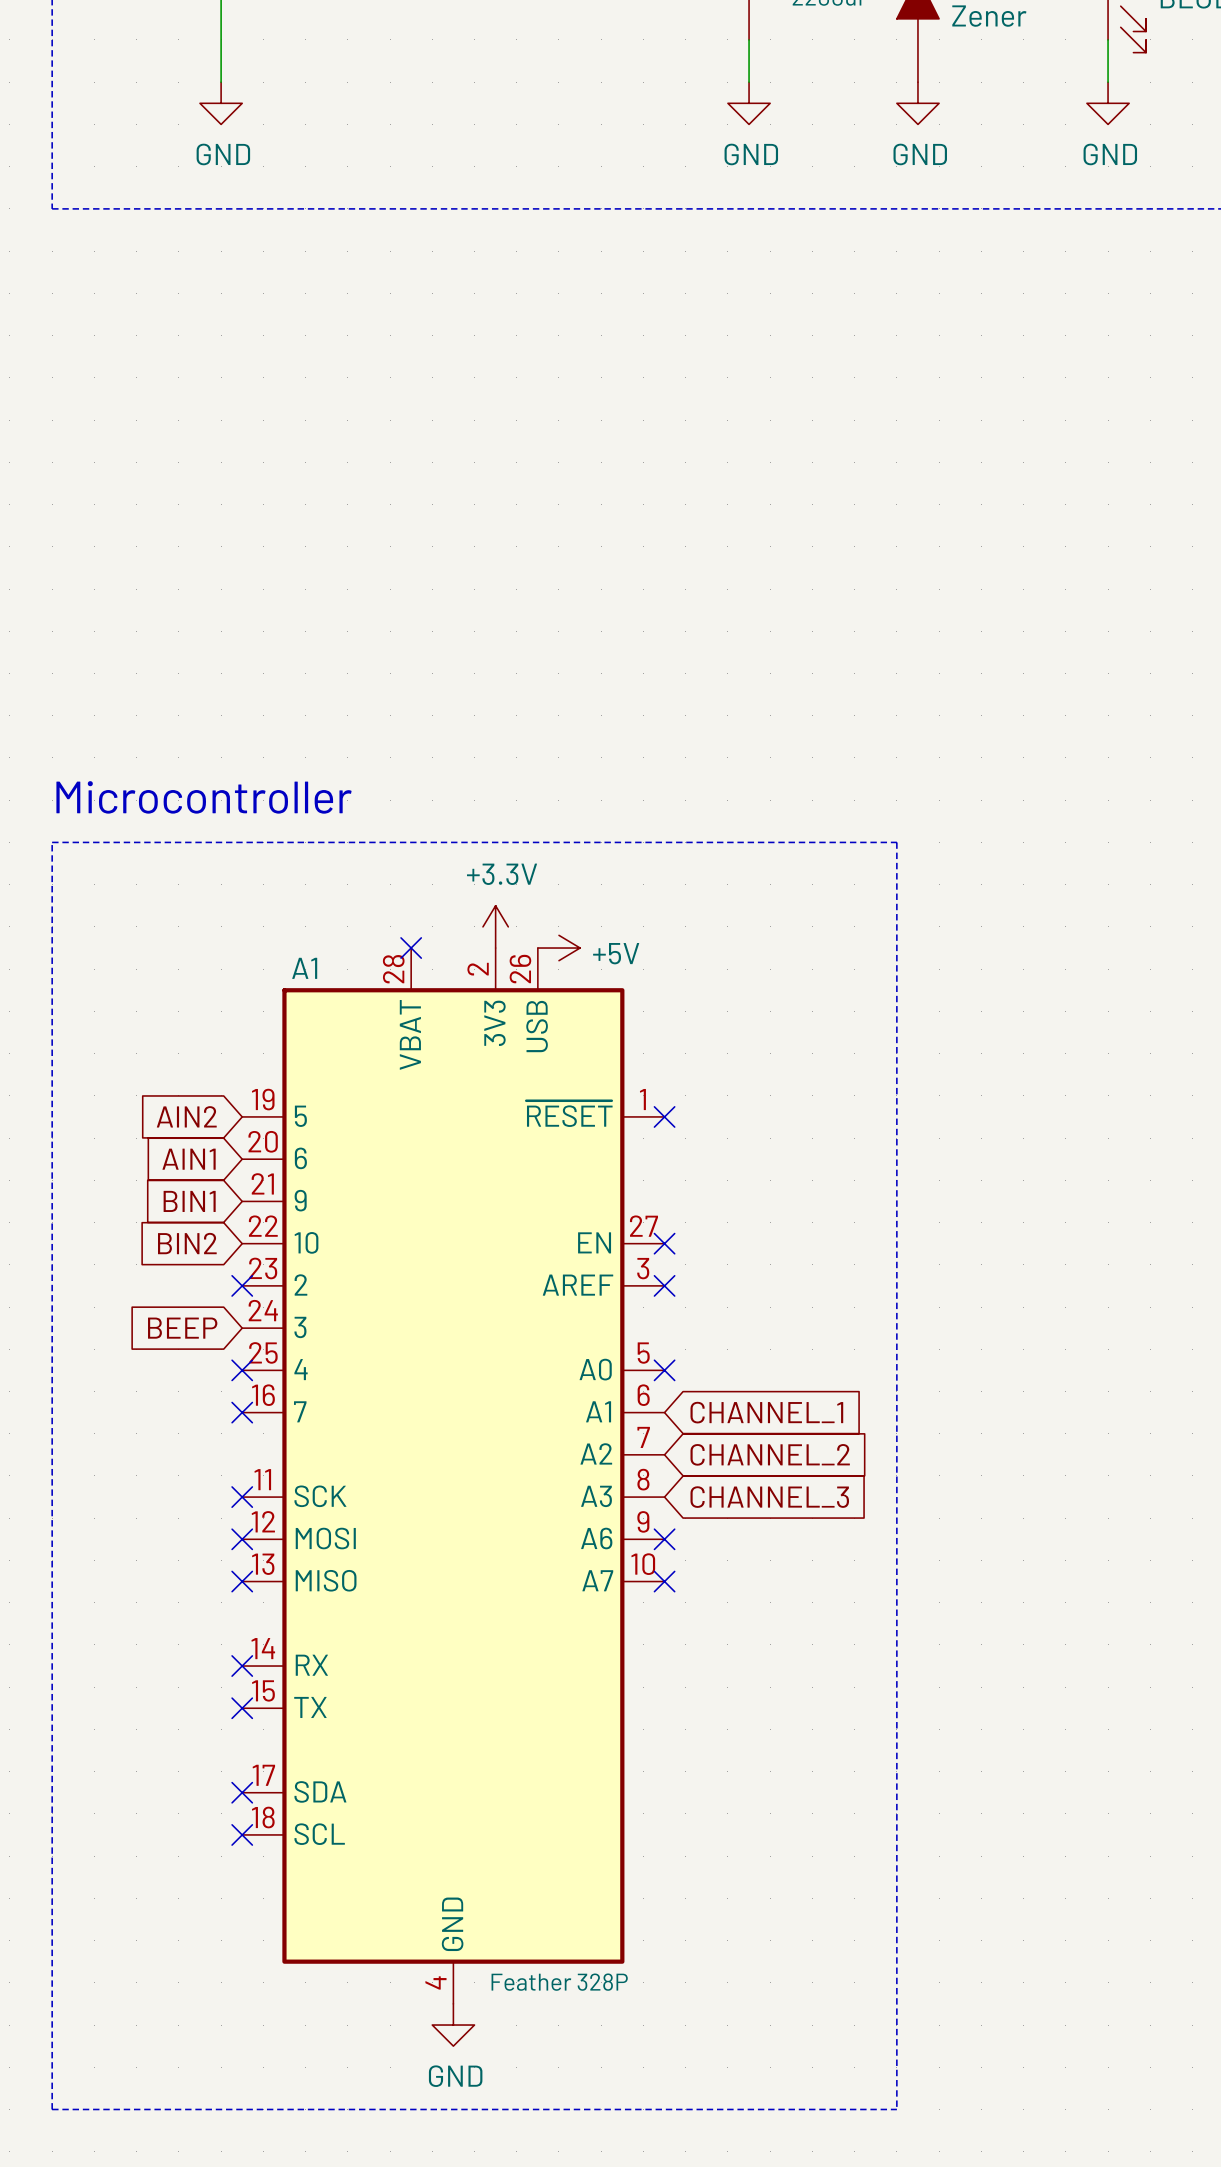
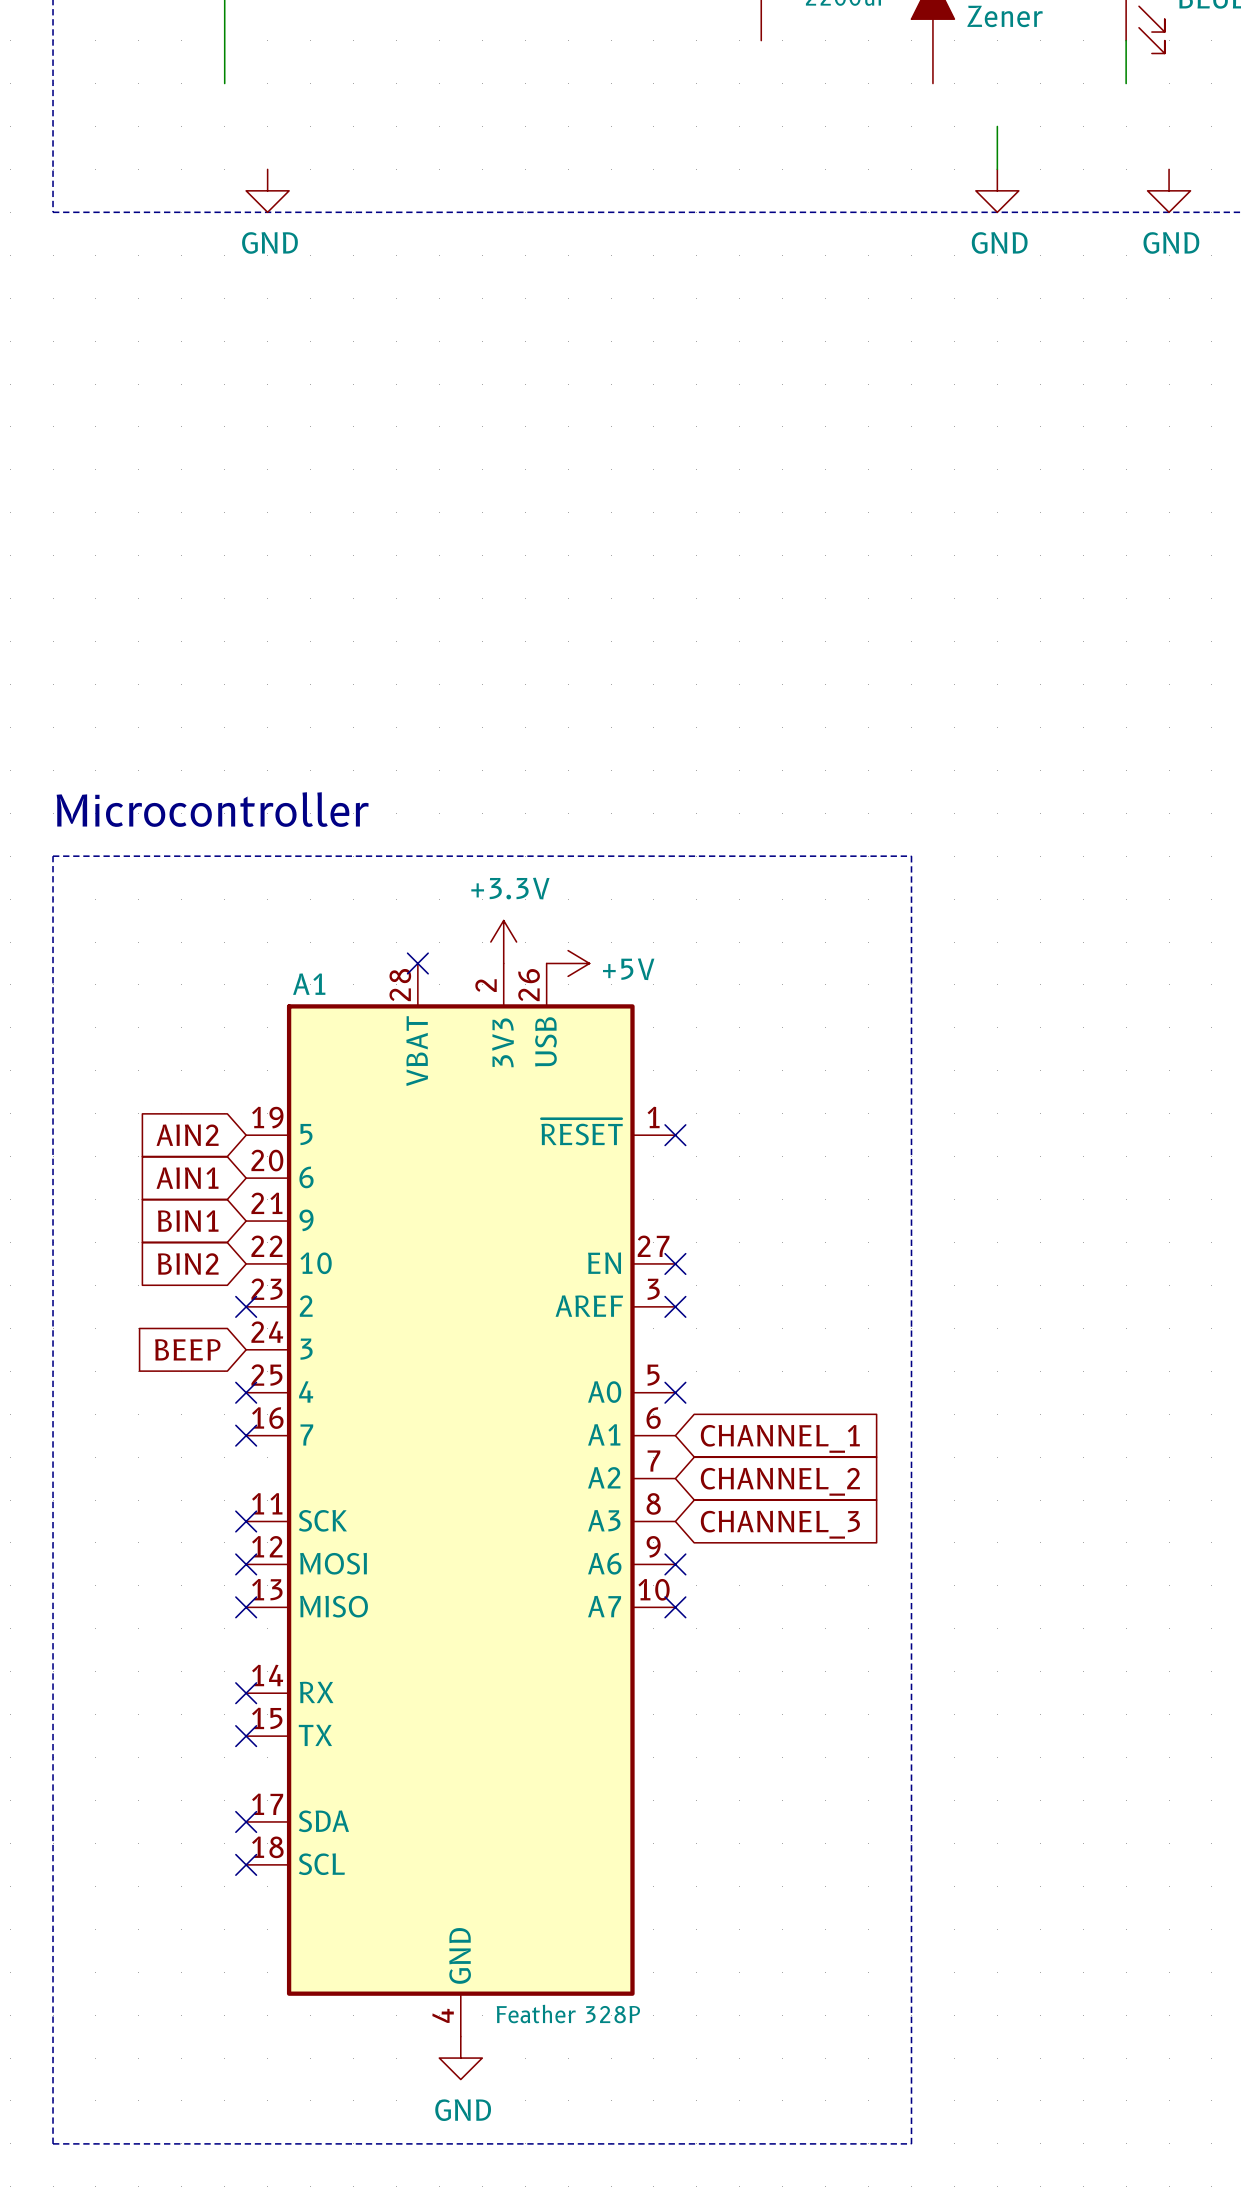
wire: (749, 39) (749, 82) -> (997, 126) (997, 169)
power symbol position: GND (221, 103) -> GND (267, 190)
power symbol: GND (749, 103) -> none
power symbol: GND (917, 103) -> none
power symbol: GND (1108, 103) -> none
power symbol: none -> GND (997, 190)
power symbol: none -> GND (1169, 190)

